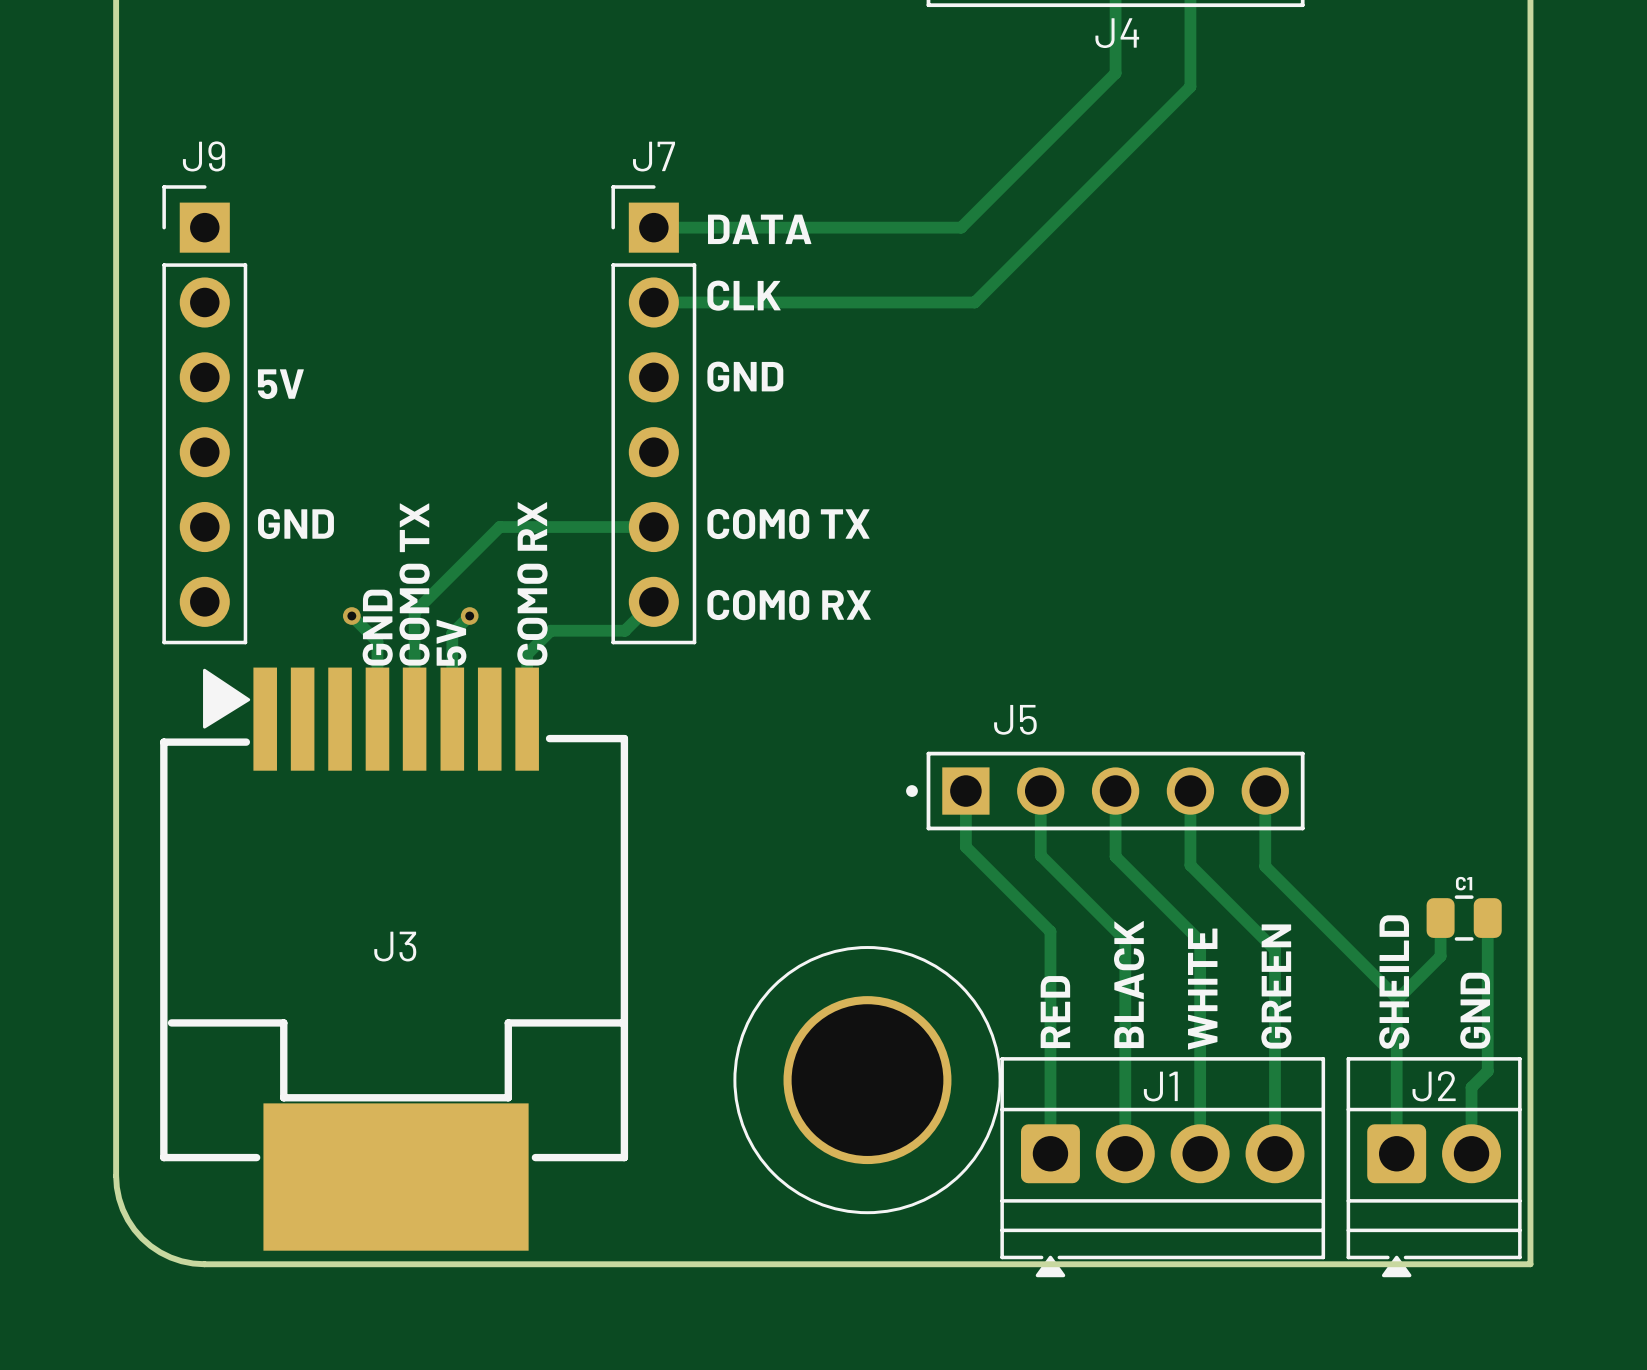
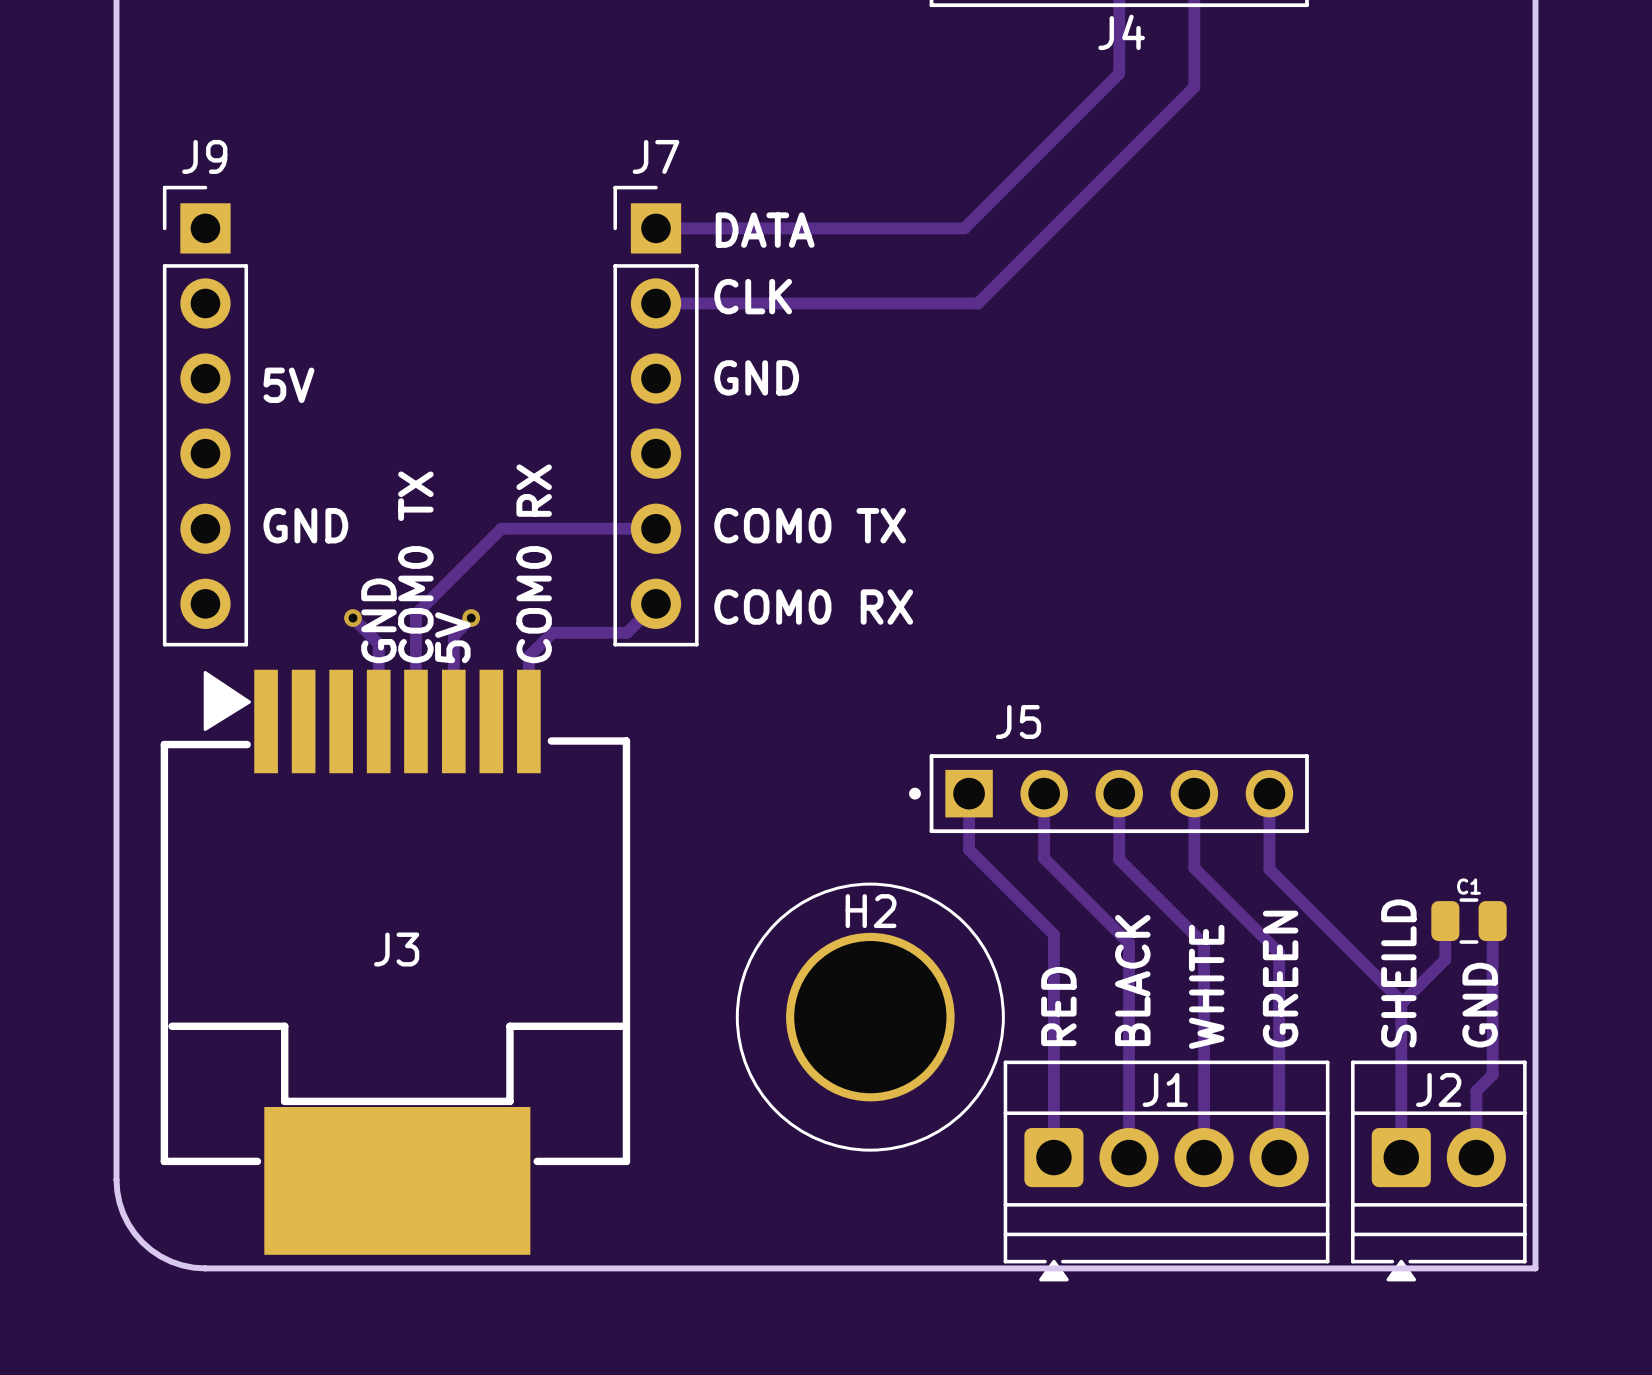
H2: none -> (870, 1017)
part: (867, 1080) -> none
drawing position: (867, 1080) -> (870, 1017)

